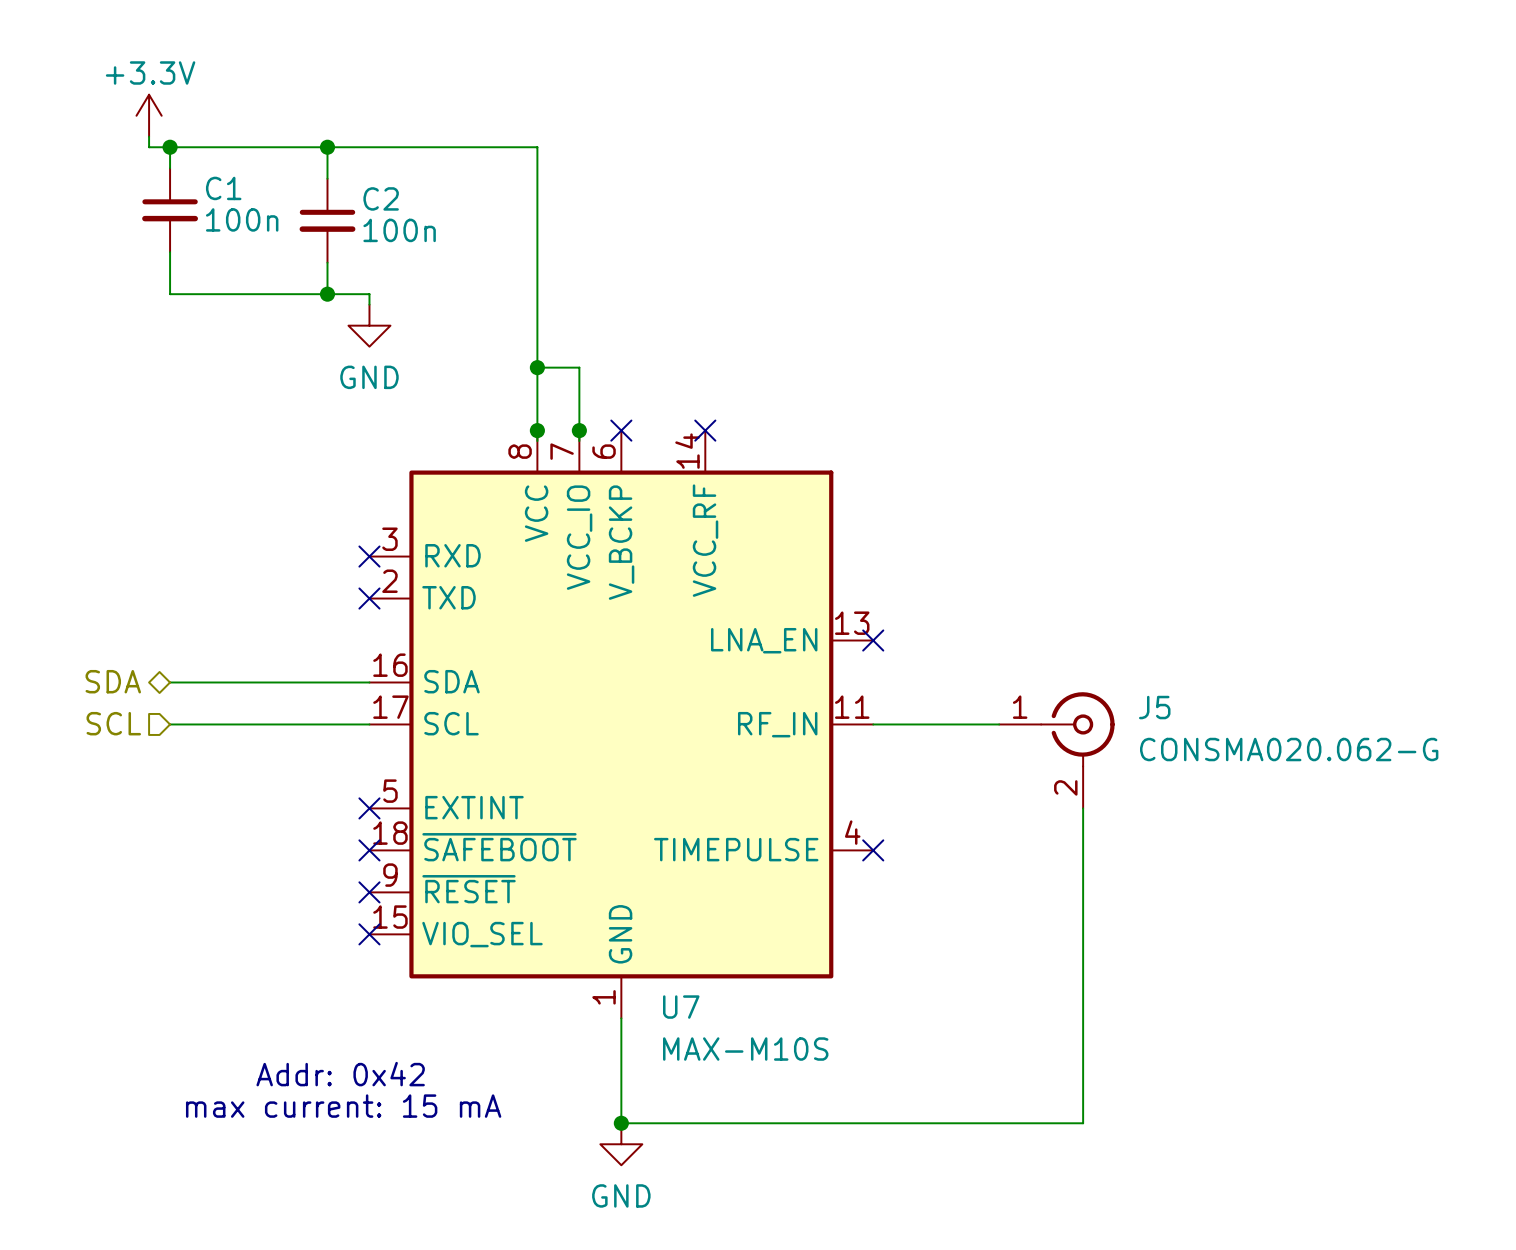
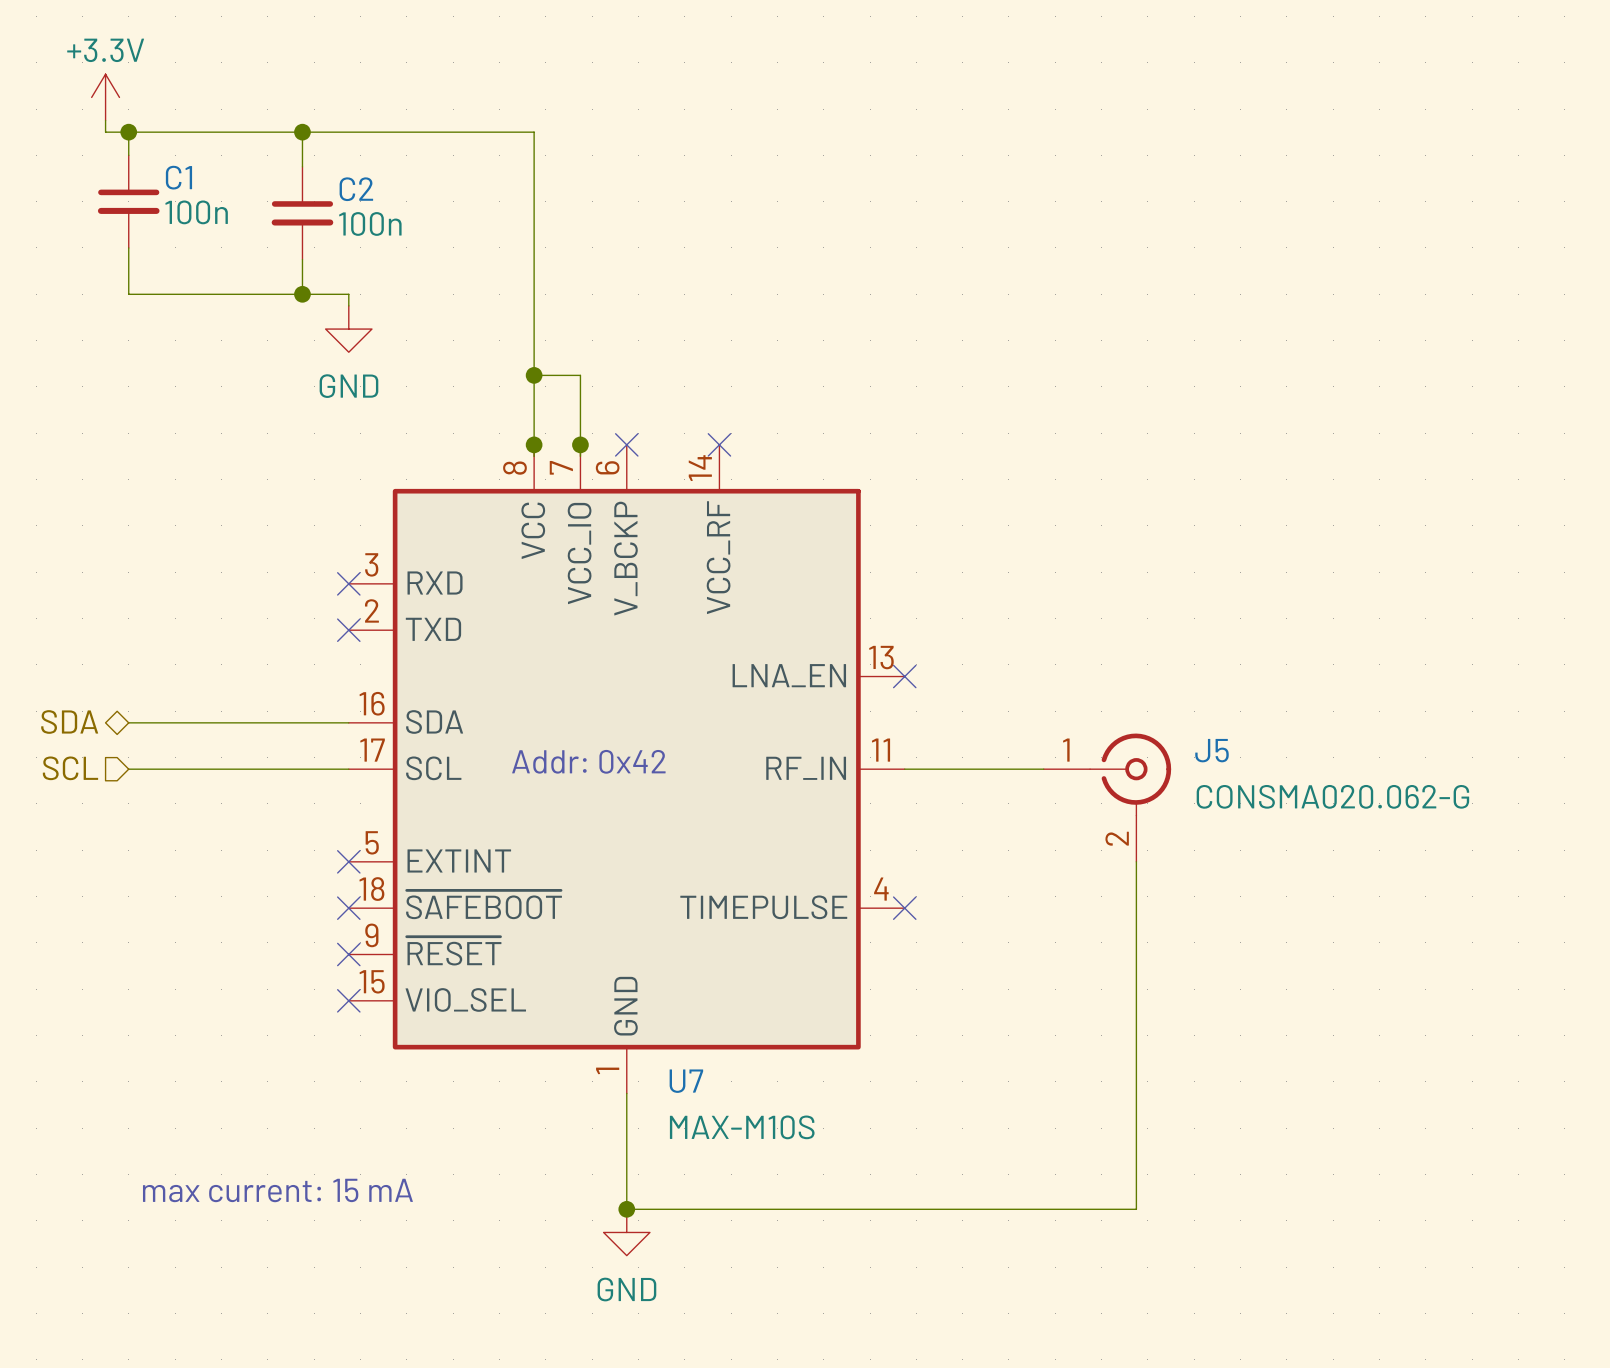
text: none -> Addr: 0x42 (588, 761)
text: Addr: 0x42 (340, 1074) -> none

